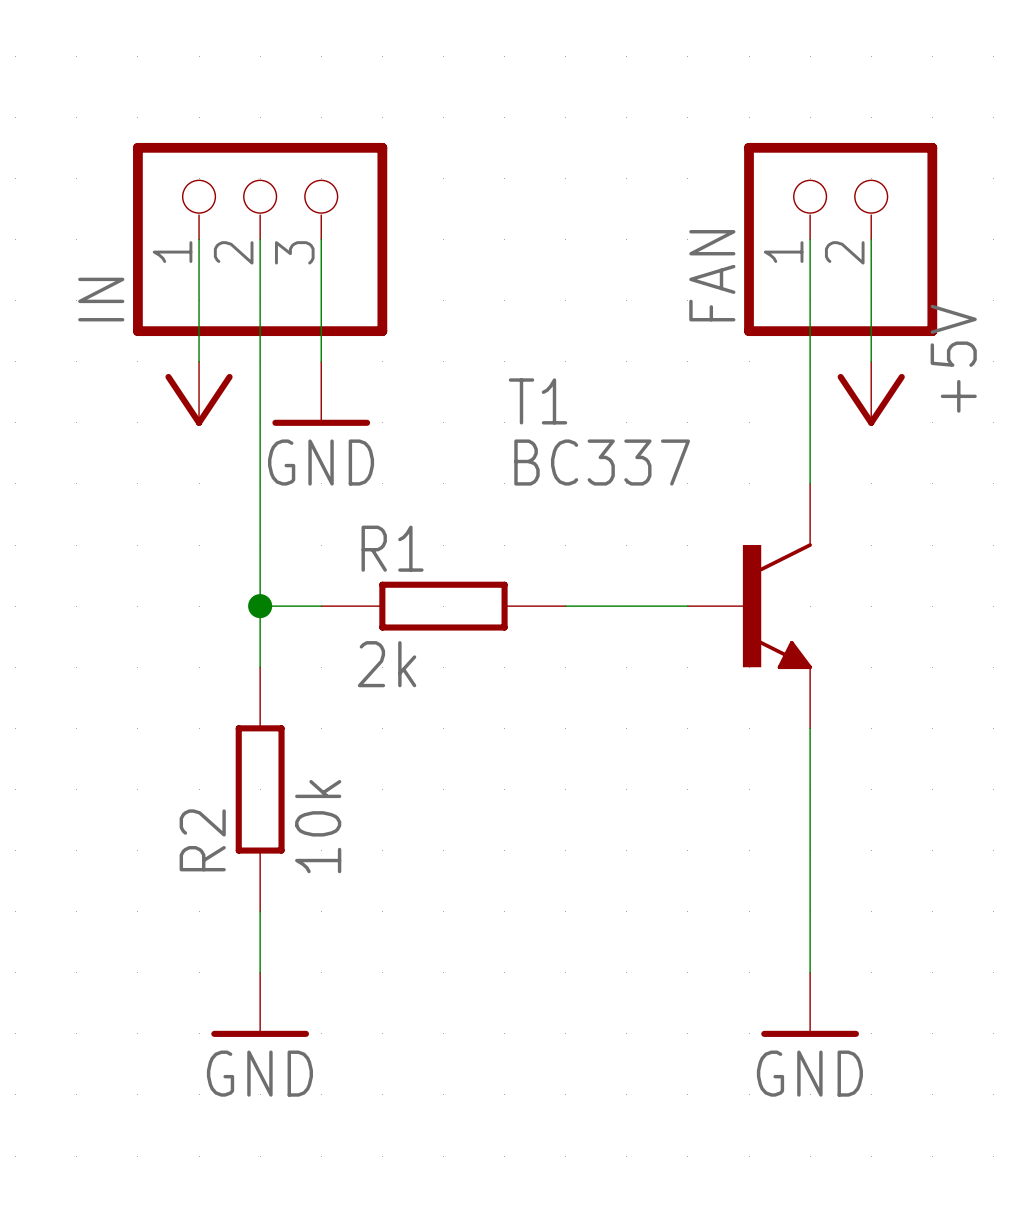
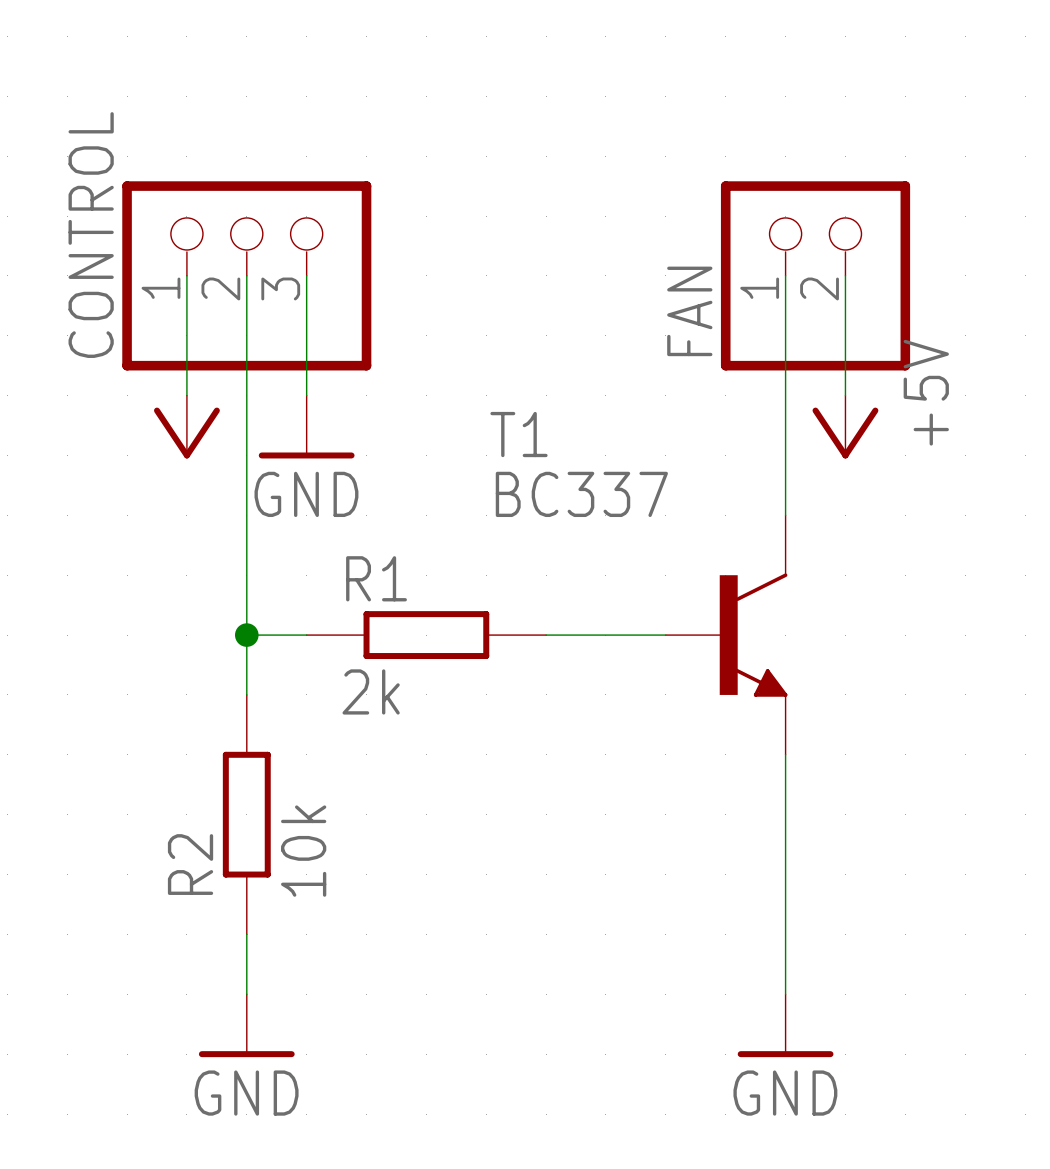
IN name: IN (101, 299) -> CONTROL (91, 235)

